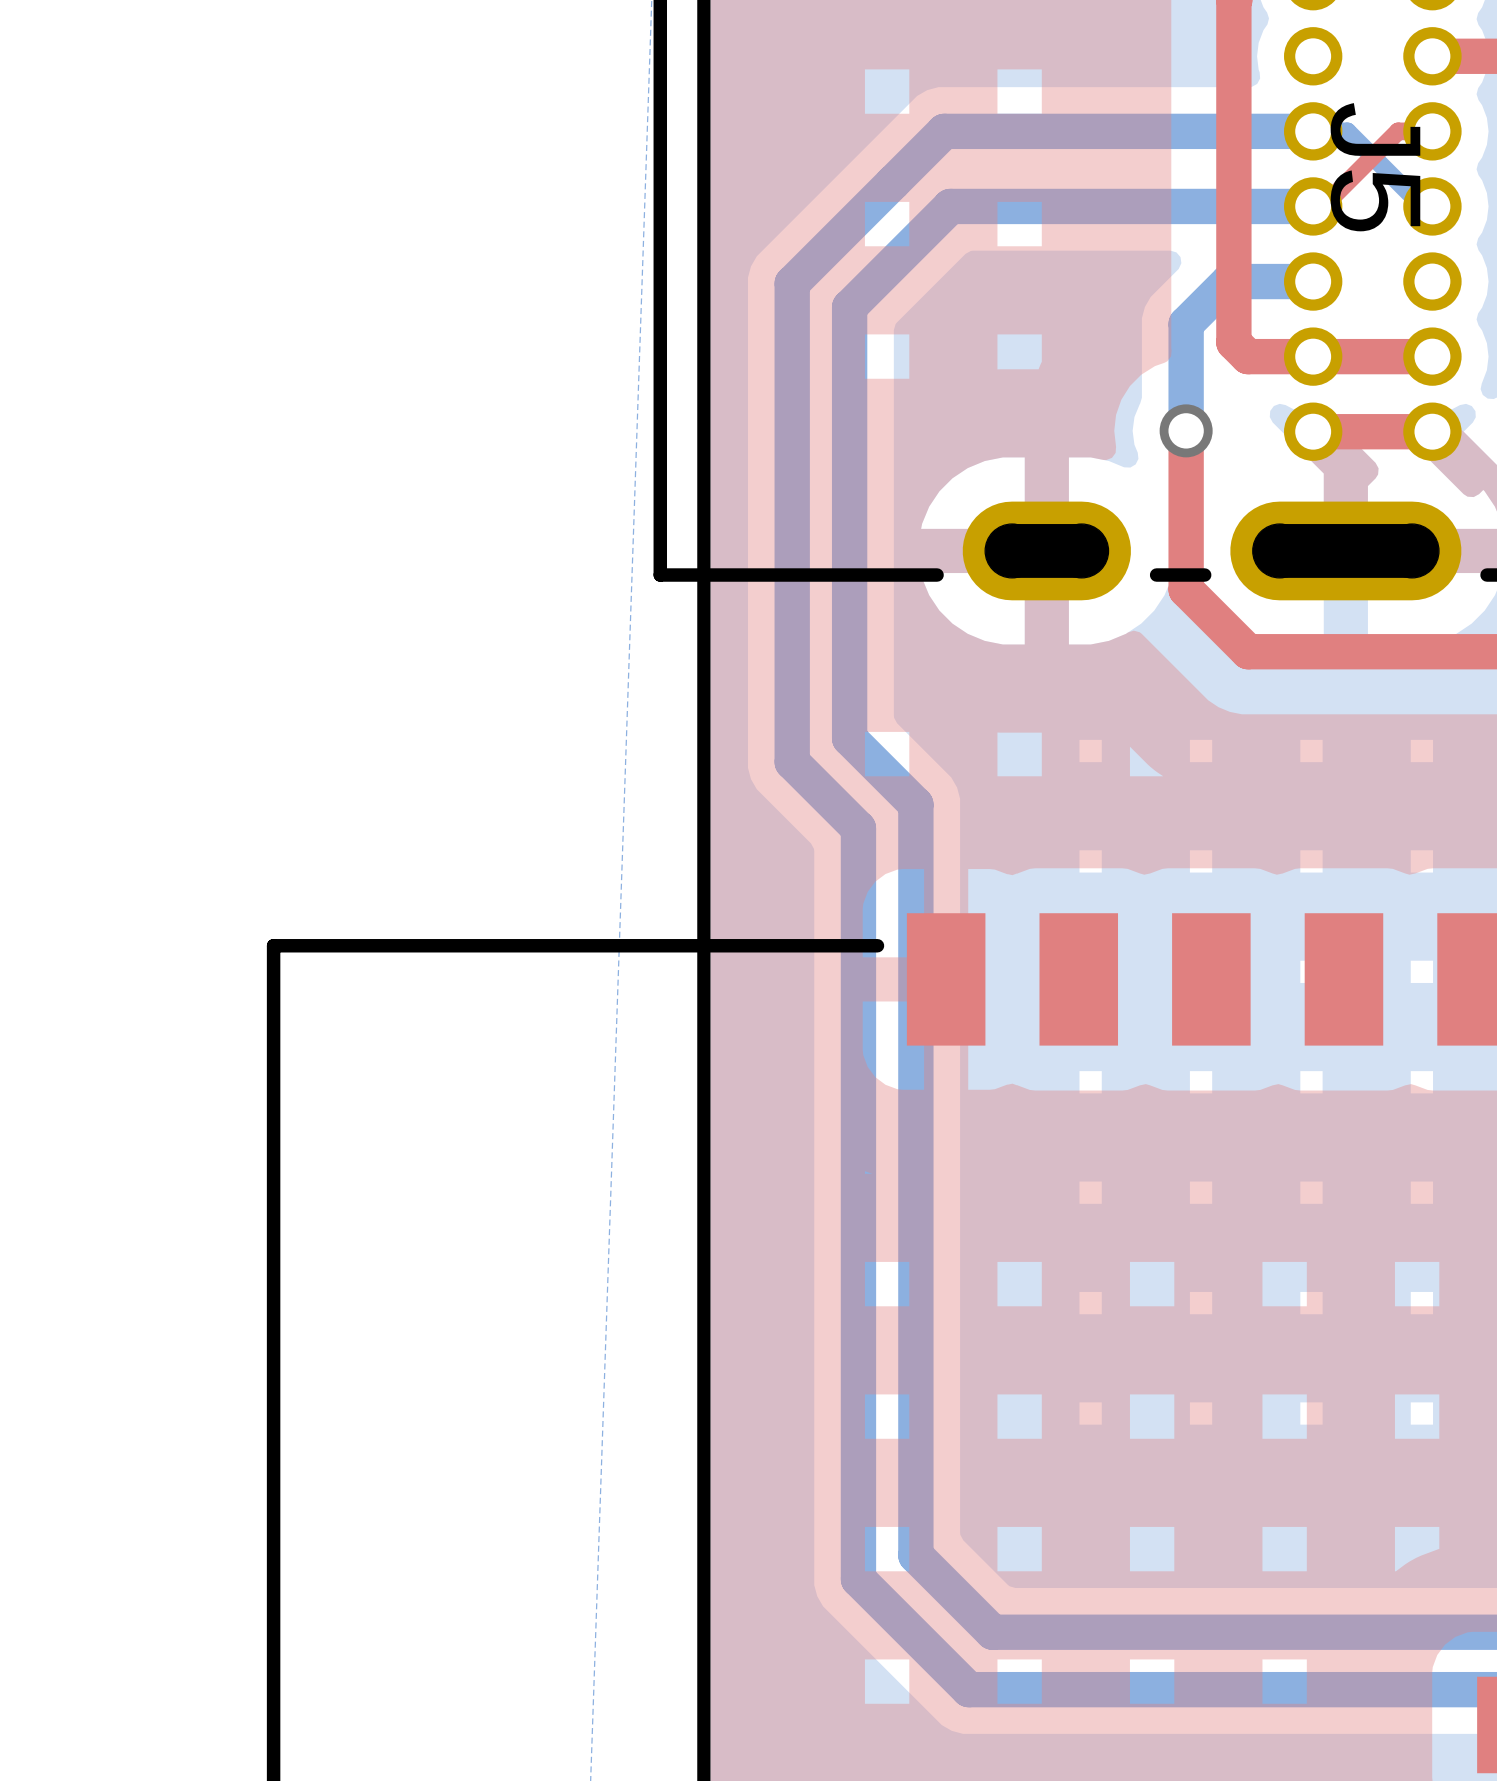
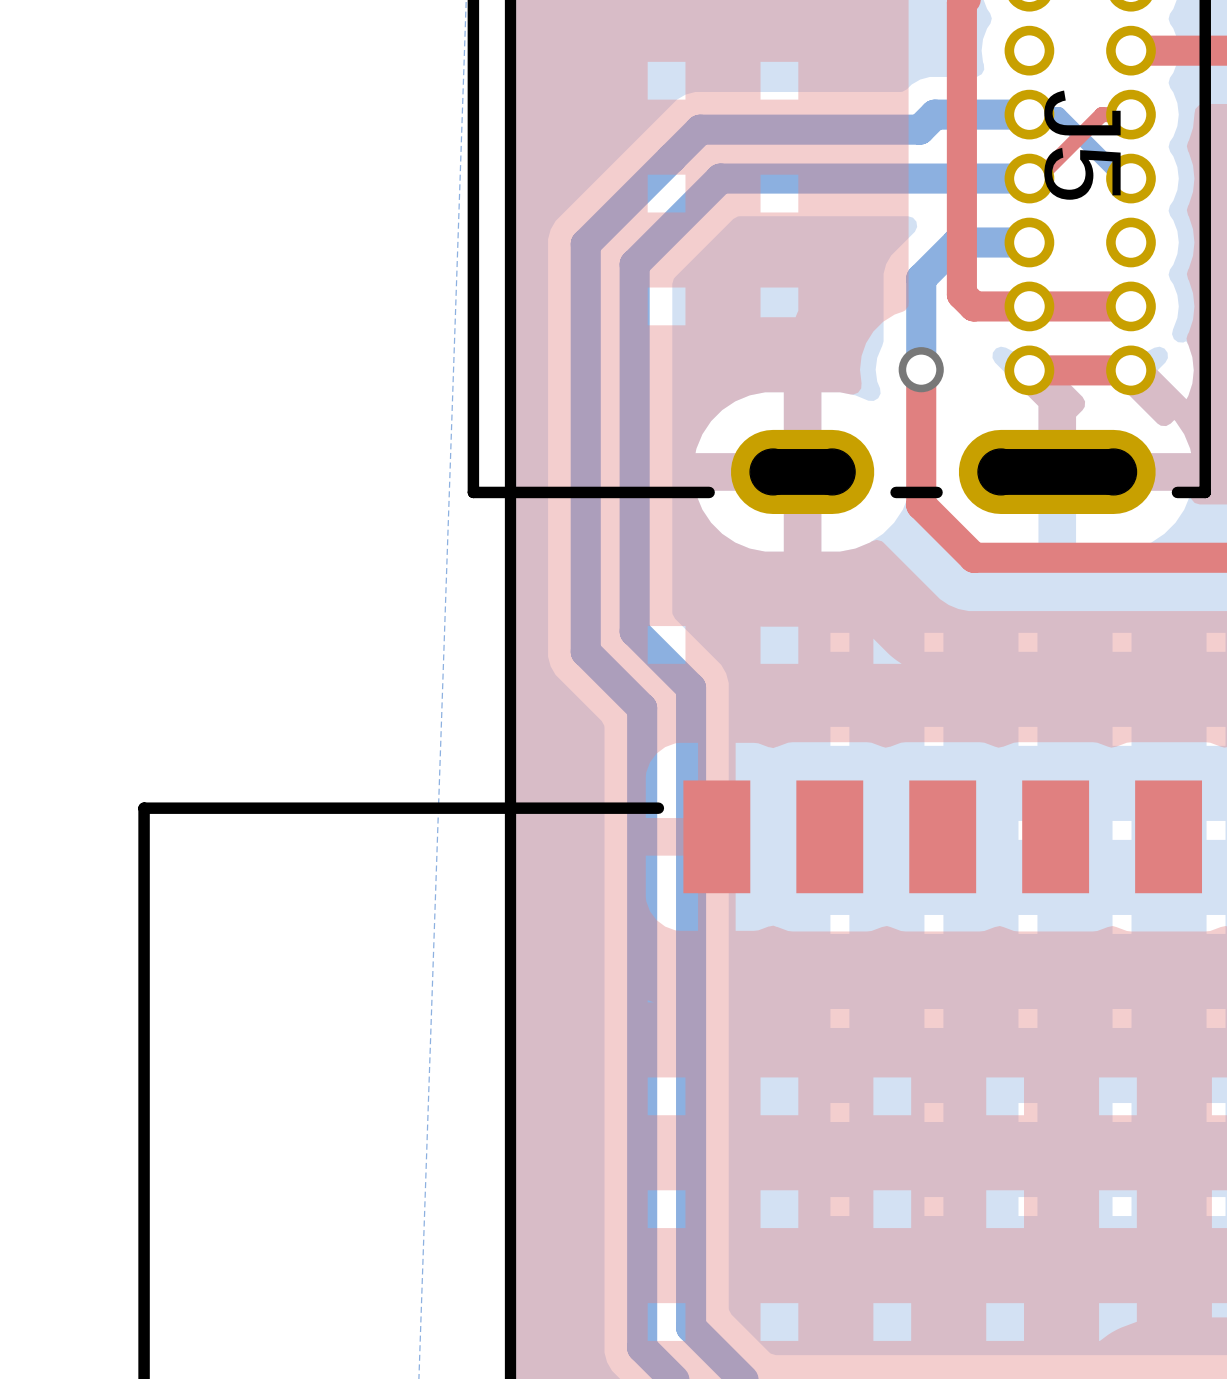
bottom track: (1202, 131) (944, 131) (926, 149) -> (934, 114) (919, 129) (700, 129)

